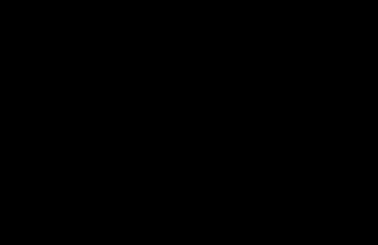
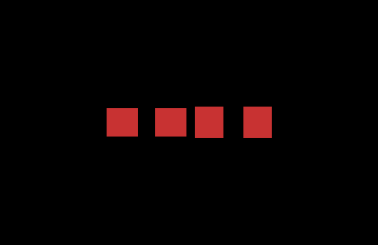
part: none -> (146, 122)
part: none -> (233, 122)

